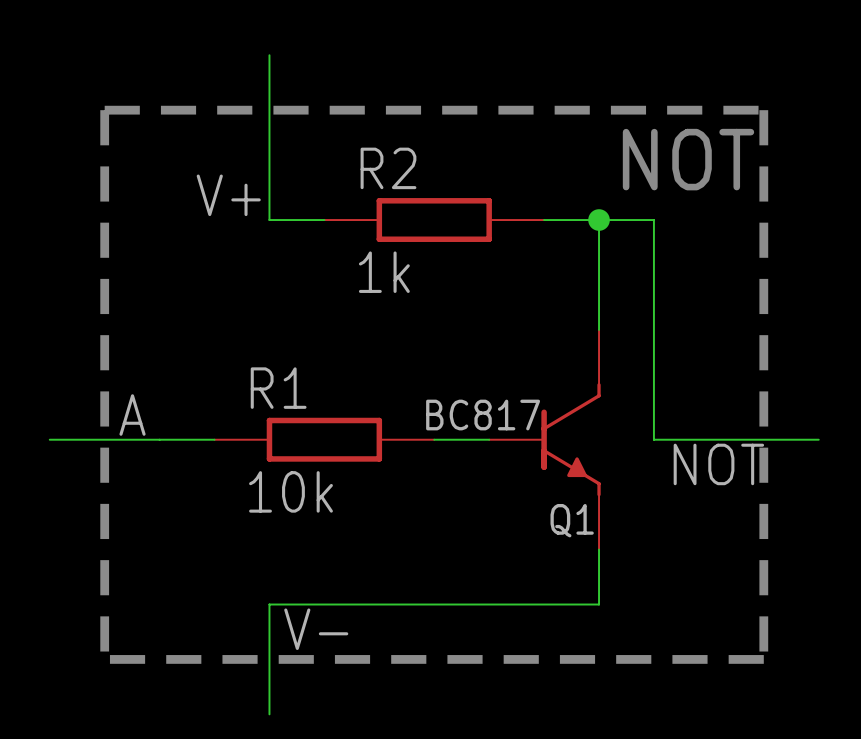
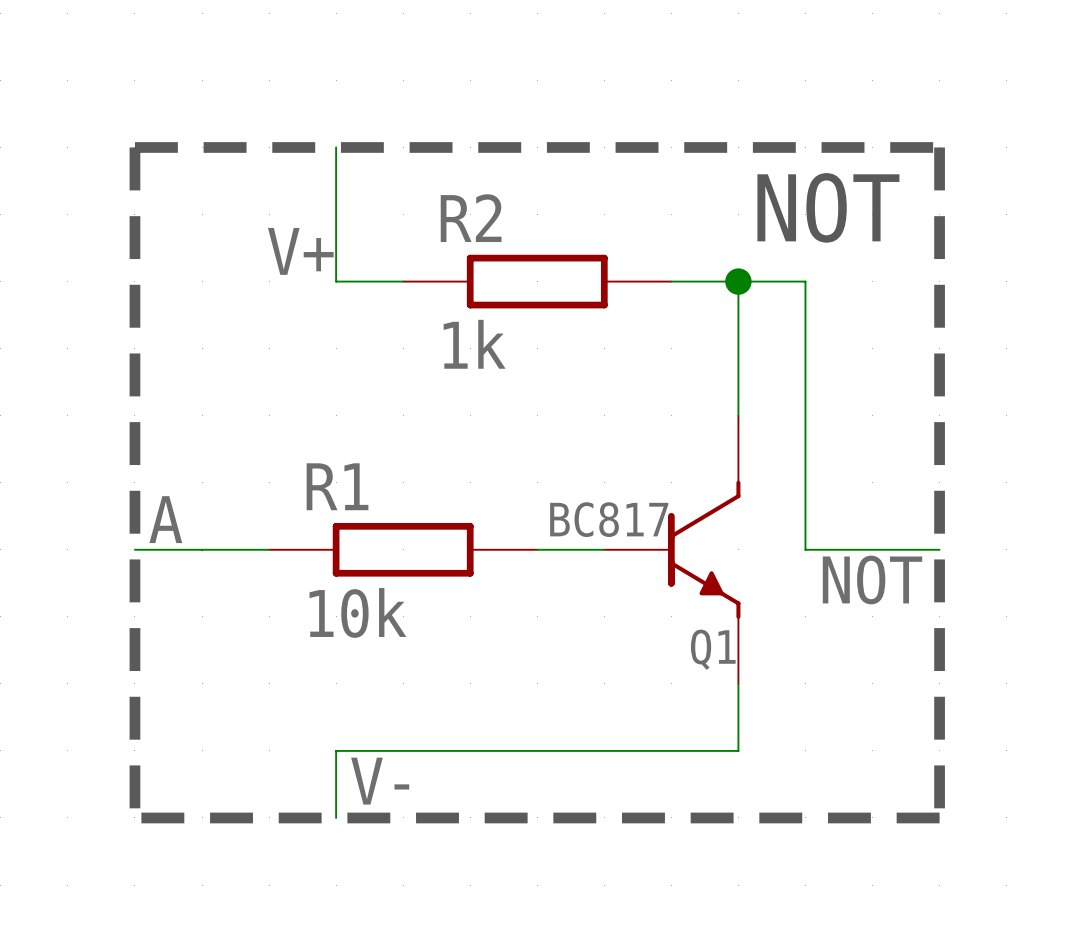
wire: (269, 55) (269, 110) -> none
wire: (49, 439) (104, 439) -> none
wire: (763, 439) (818, 439) -> none
wire: (269, 659) (269, 714) -> none

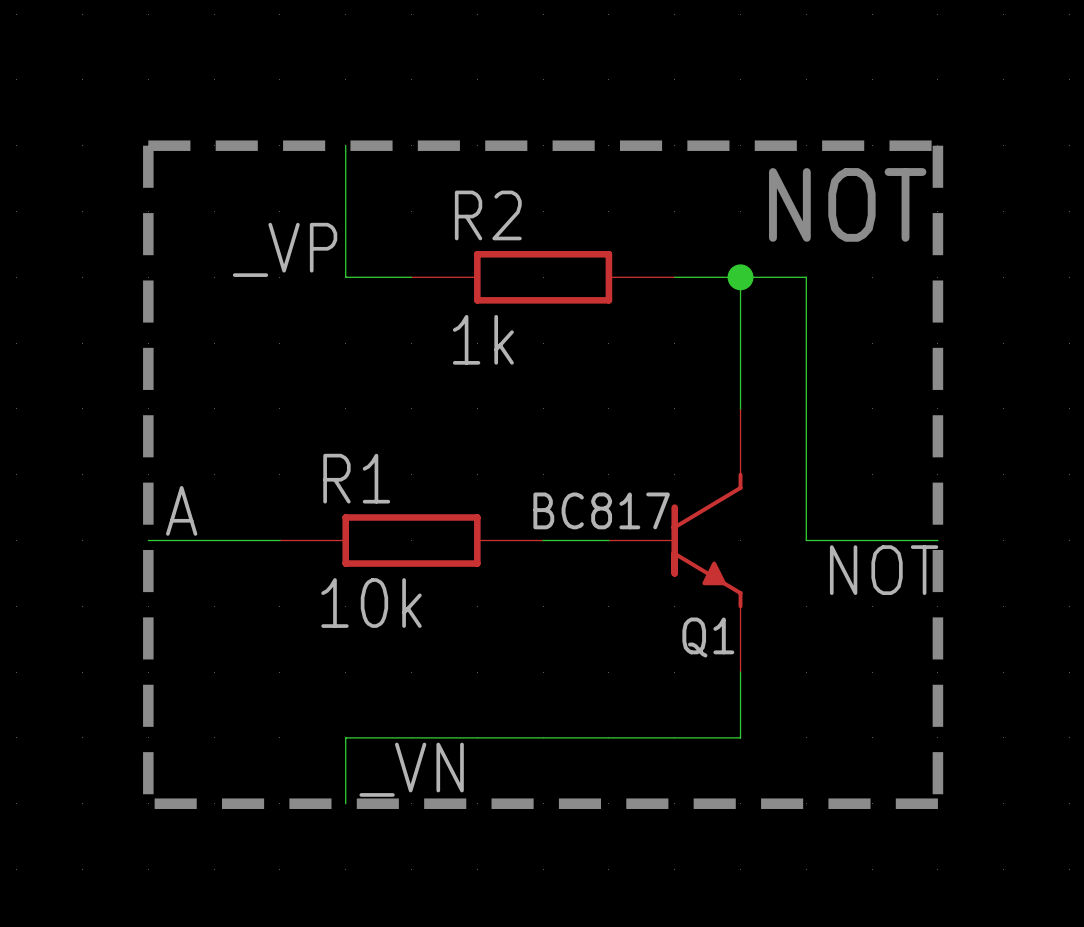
label: V+ (300, 251) -> _VP (285, 249)
label: V- (380, 781) -> _VN (411, 769)

